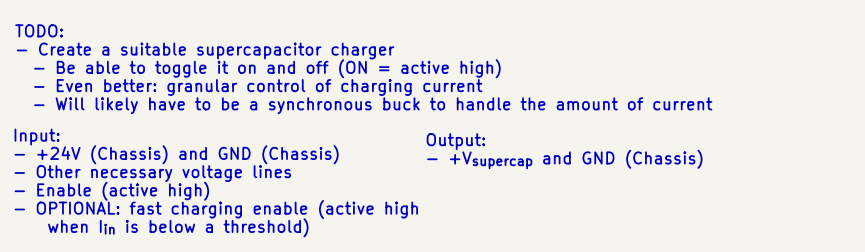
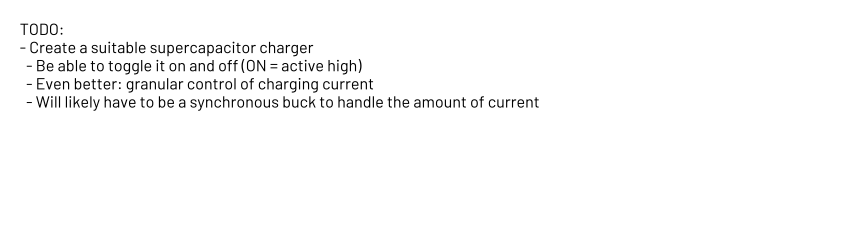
text: Input: (37, 137) -> none
text: Output: (455, 141) -> none
text: - +24V (Chassis) and GND (Chassis) (176, 154) -> none
text: - +Vsupercap and GND (Chassis) (564, 159) -> none
text: - Other necessary voltage lines (152, 173) -> none
text: - Enable (active high) (111, 191) -> none
text: - OPTIONAL: fast charging enable (active high (216, 209) -> none
text: when Iin is below a threshold) (178, 227) -> none

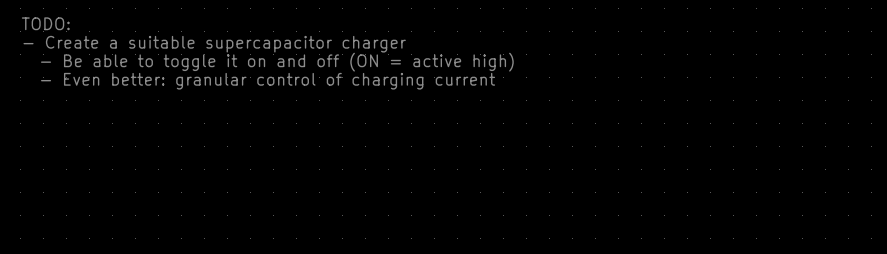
text: - Will likely have to be a synchronous buck to handle the amount of current (282, 103) -> none

